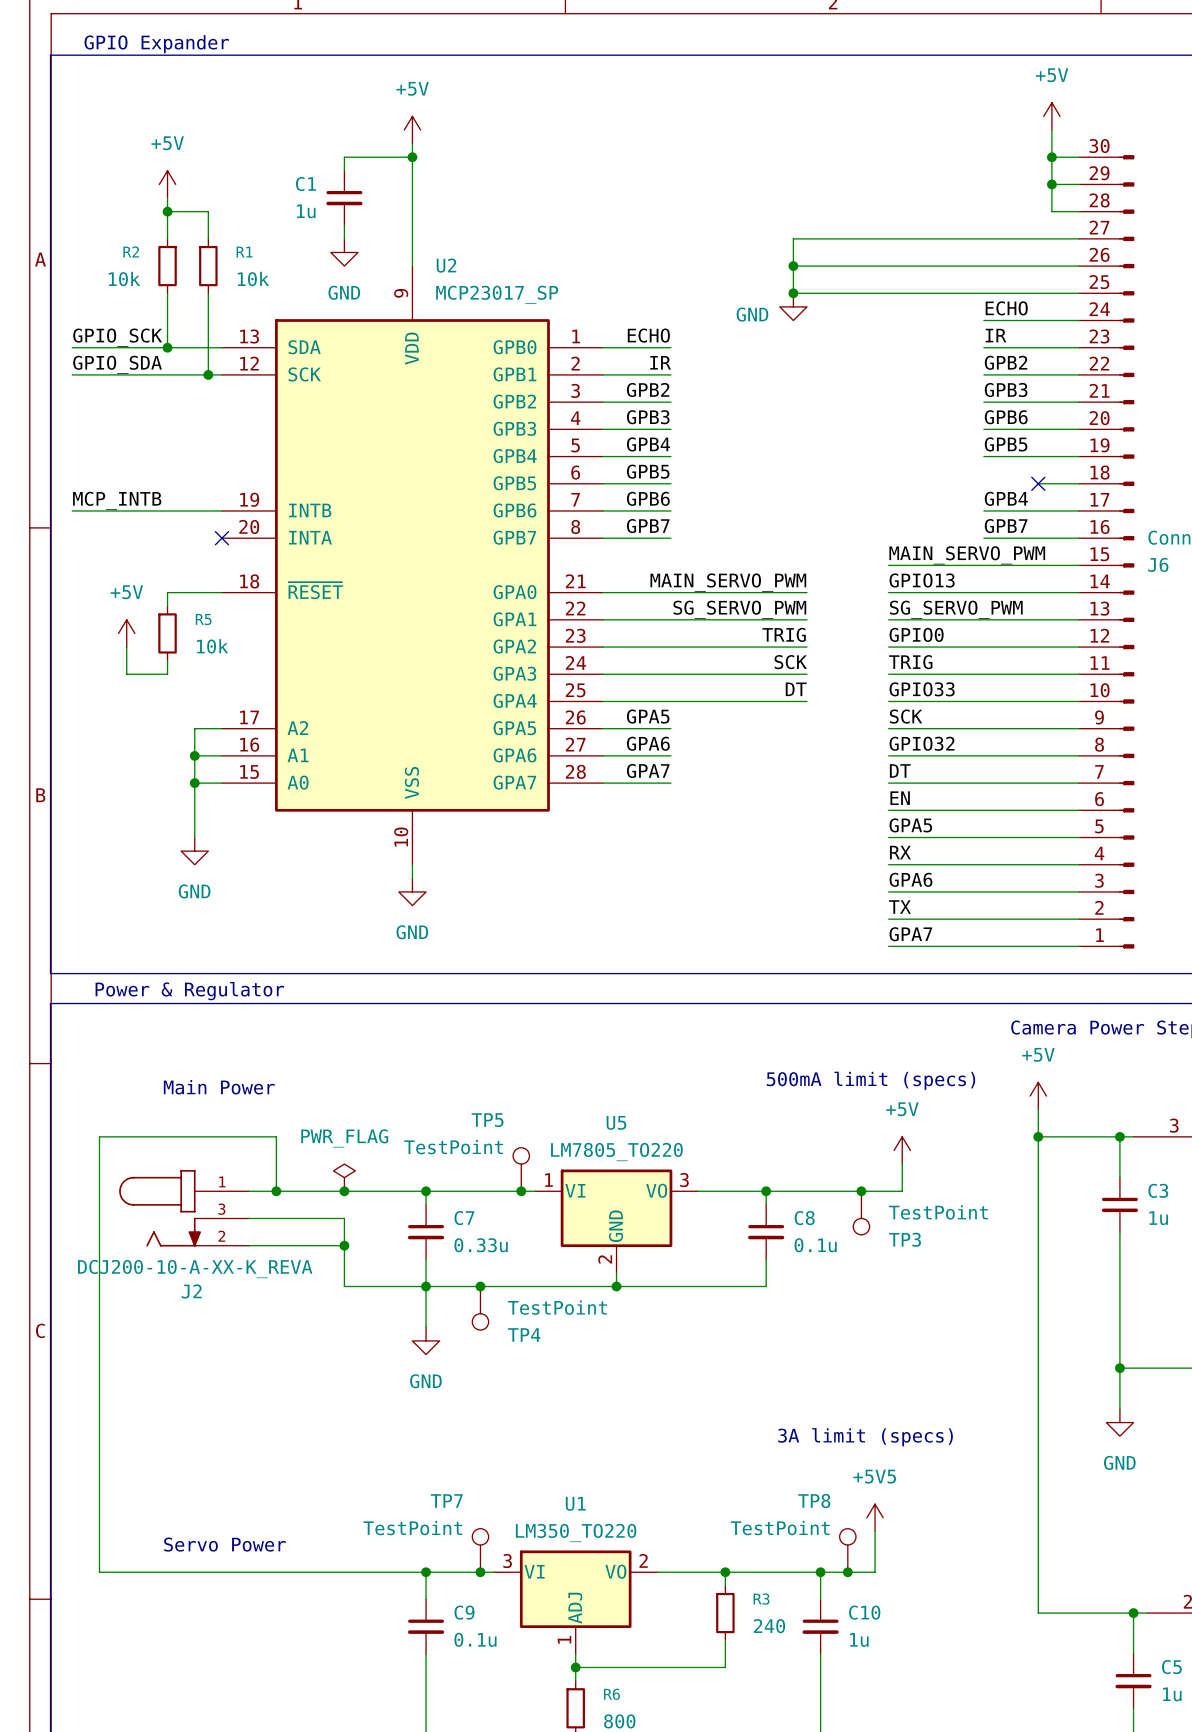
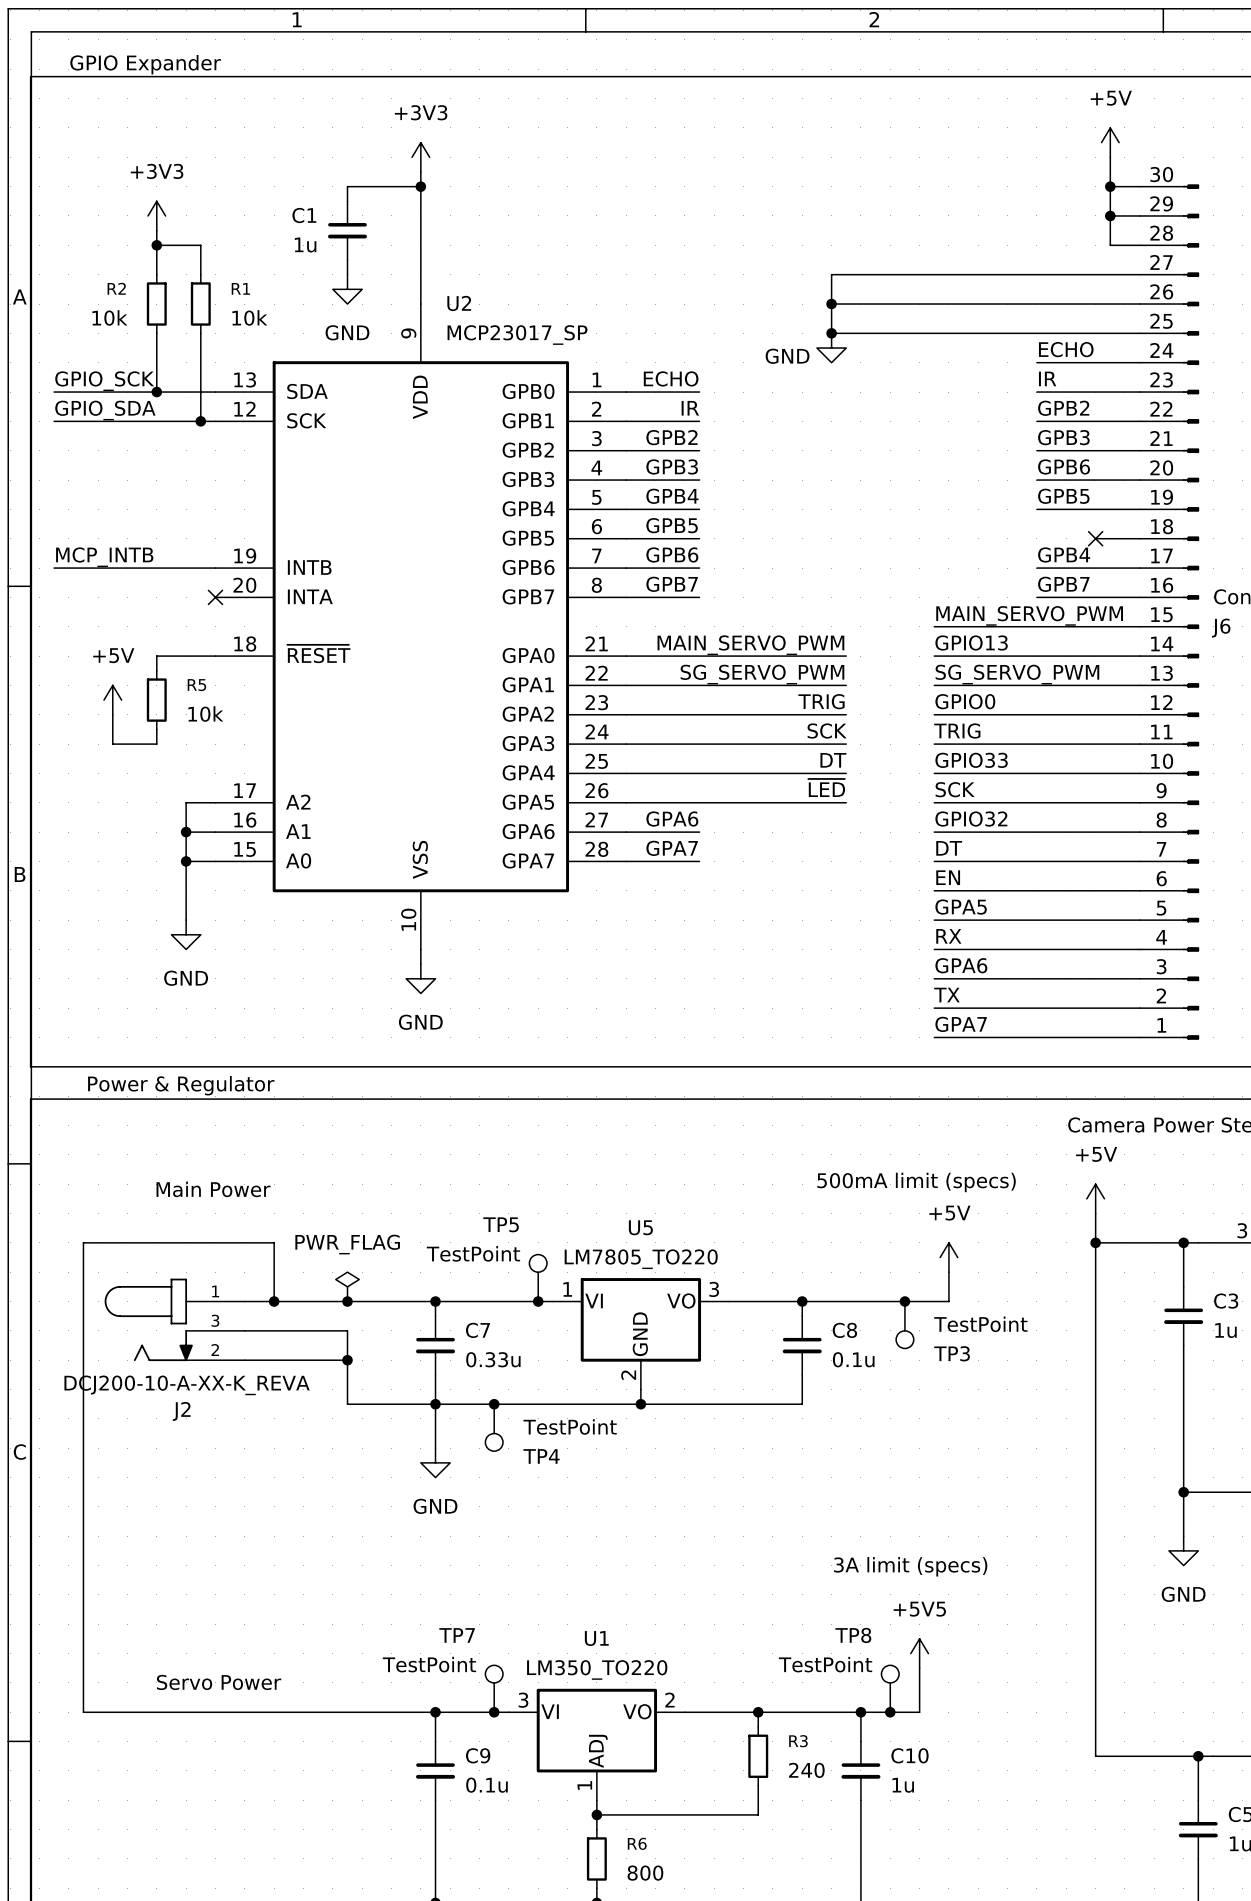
power symbol: +5V (412, 130) -> +3V3 (420, 157)
power symbol: +5V (167, 184) -> +3V3 (156, 215)
label: none -> ~{LED} (826, 787)
label: GPA5 (648, 716) -> none
wire: none -> (699, 802) (846, 802)

